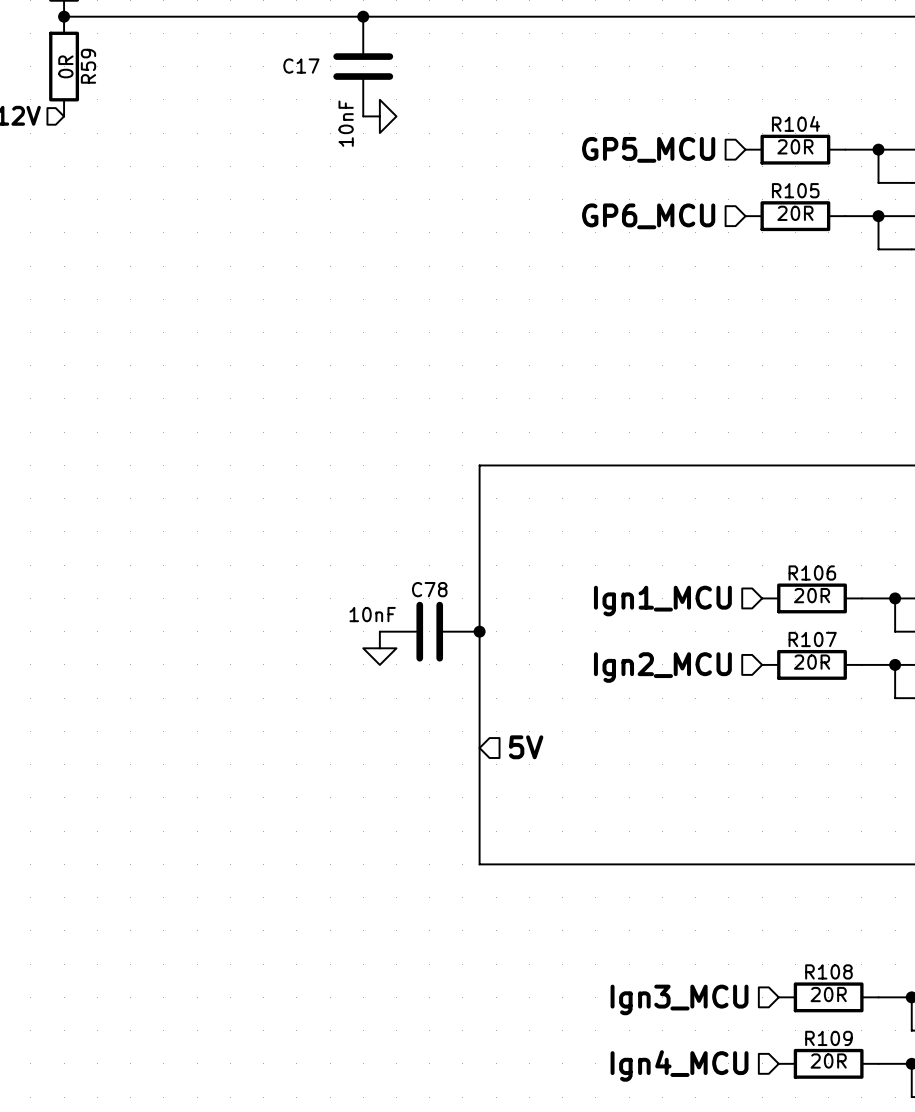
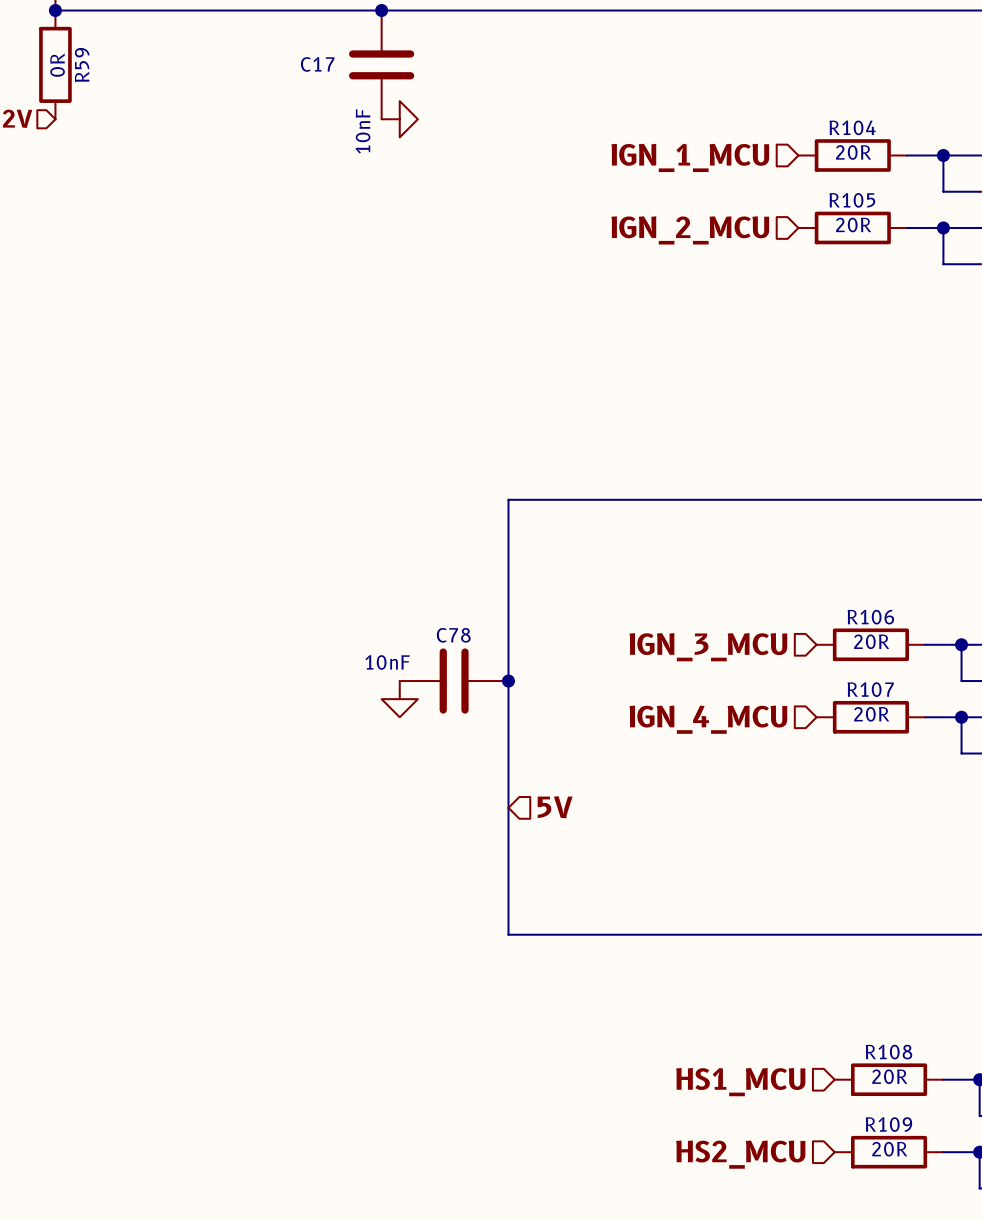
hierarchical label: GP5_MCU (648, 149) -> IGN_1_MCU (690, 157)
hierarchical label: GP6_MCU (648, 216) -> IGN_2_MCU (690, 230)
hierarchical label: Ign1_MCU (662, 601) -> IGN_3_MCU (708, 647)
hierarchical label: Ign2_MCU (662, 667) -> IGN_4_MCU (708, 719)
hierarchical label: Ign3_MCU (679, 999) -> HS1_MCU (740, 1082)
hierarchical label: Ign4_MCU (679, 1065) -> HS2_MCU (740, 1154)

